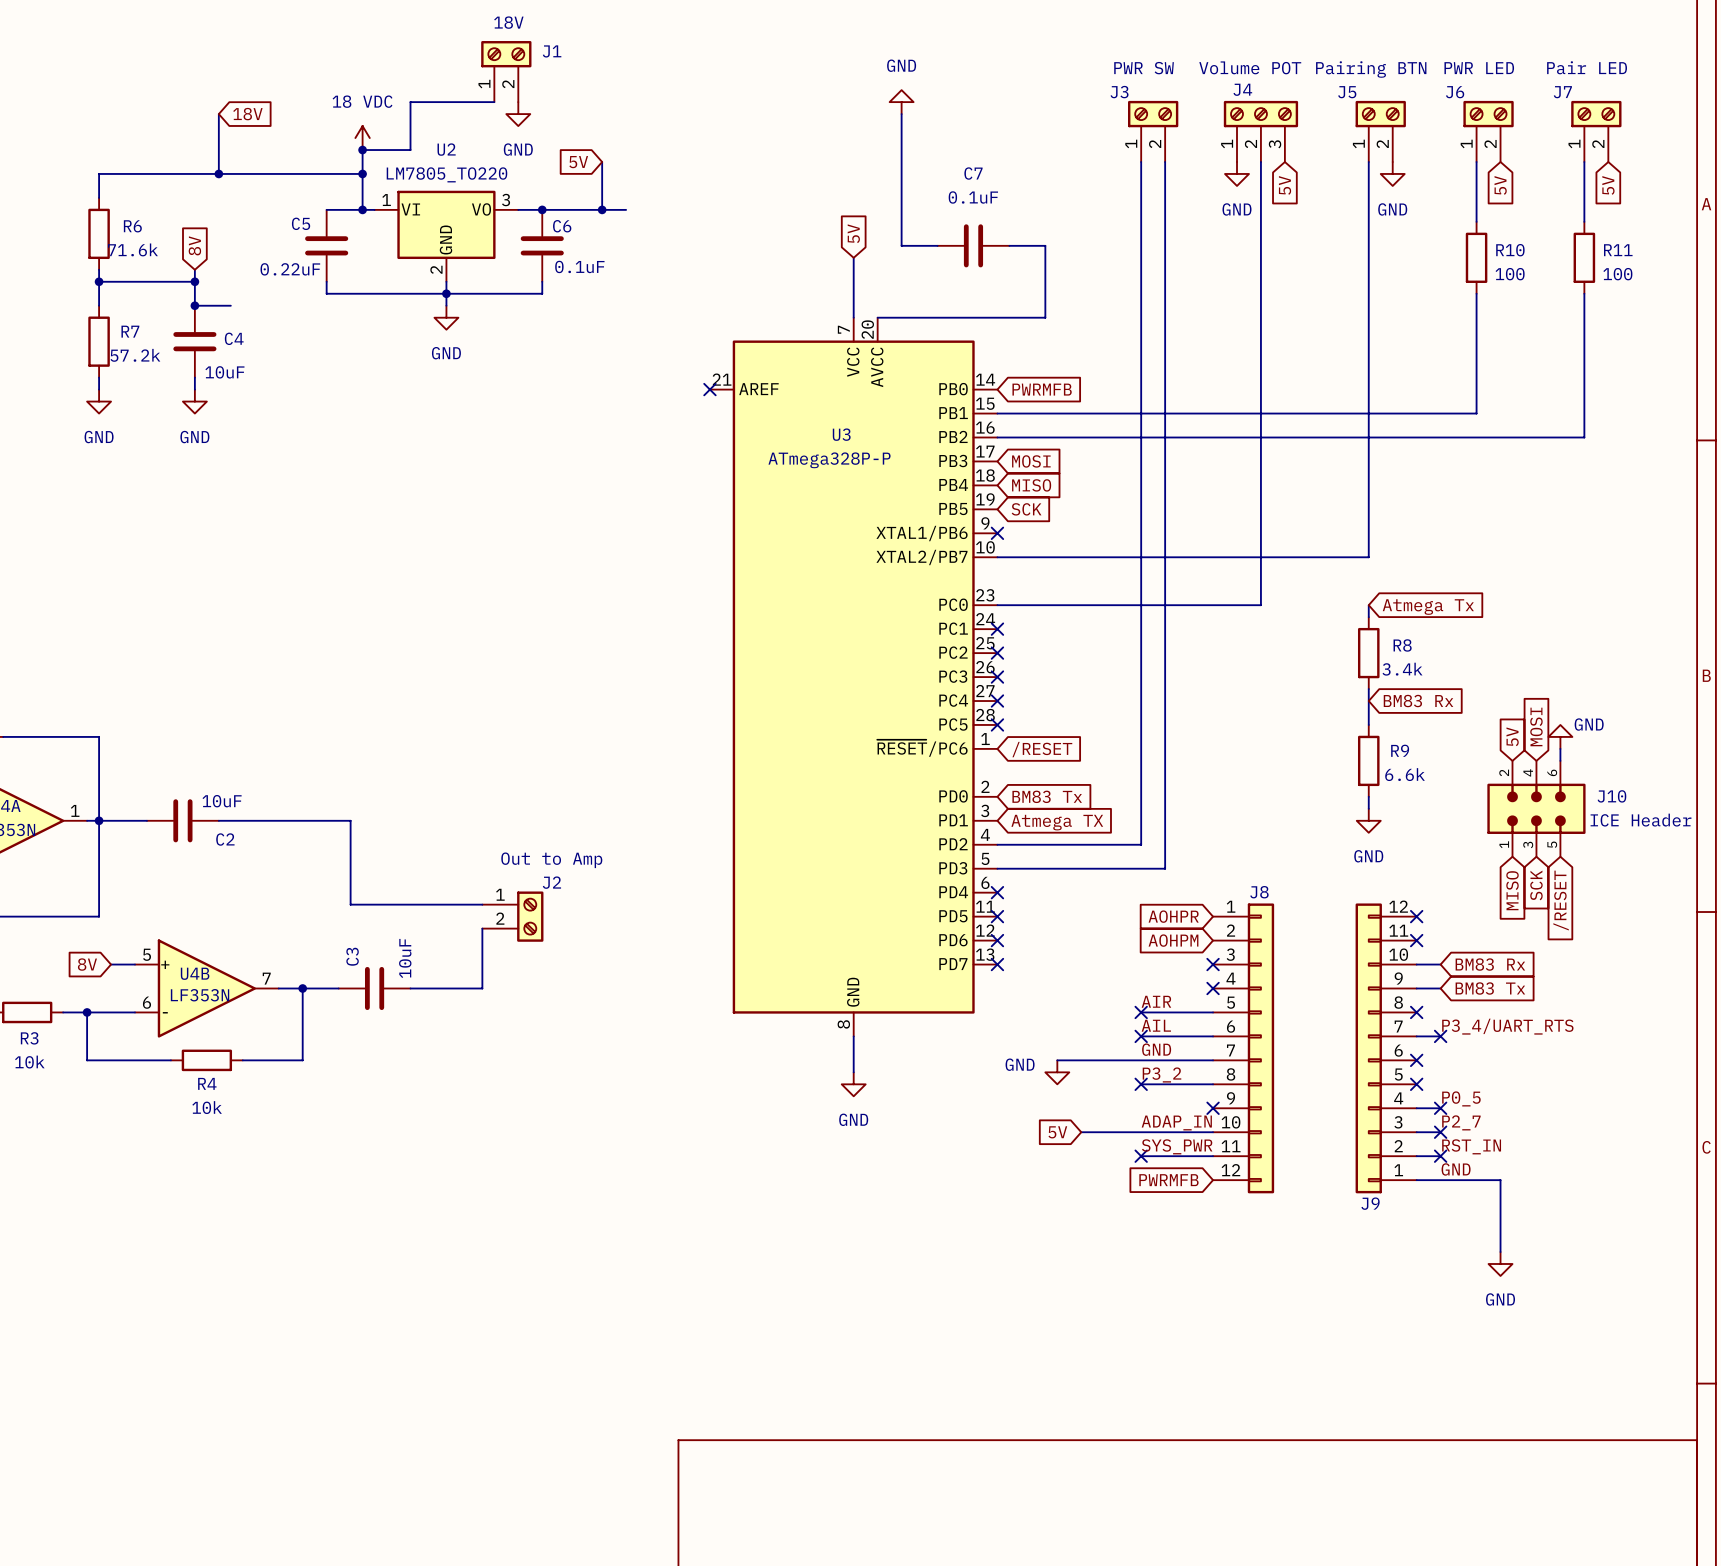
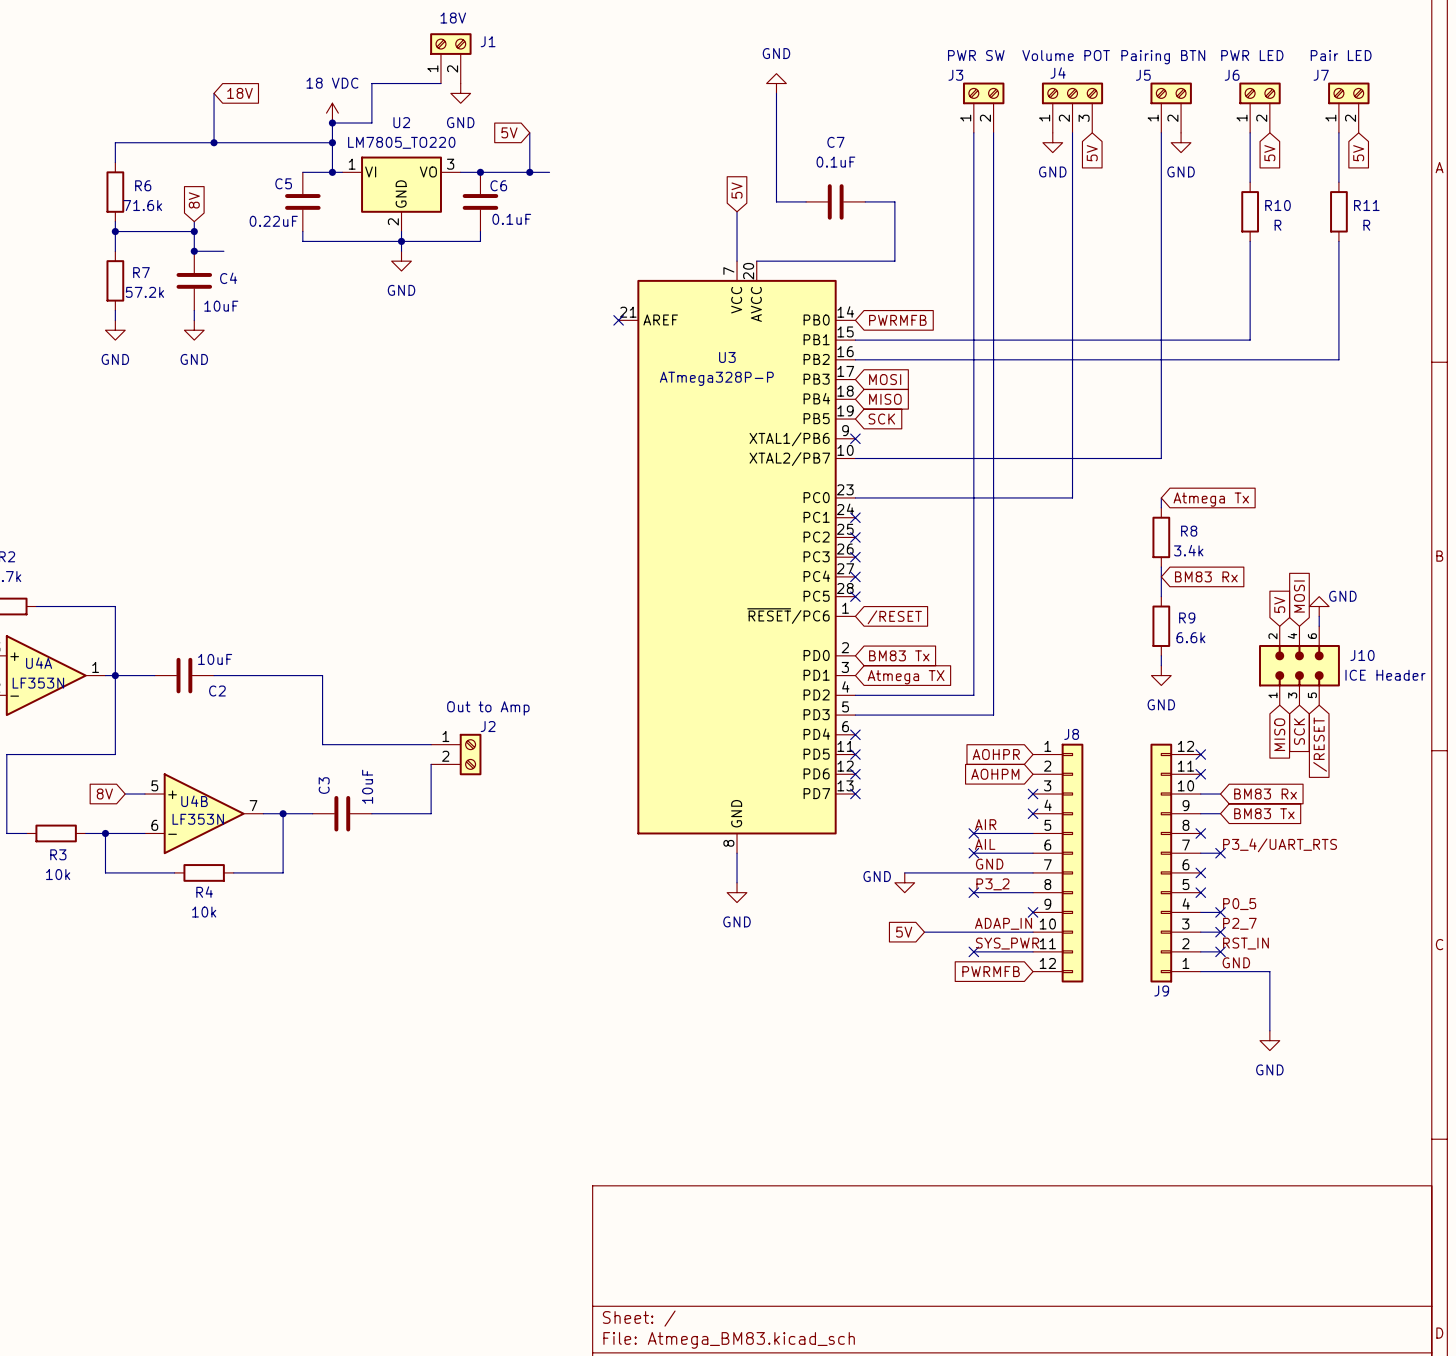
R10 value: 100 (1510, 274) -> R (1277, 225)
R11 value: 100 (1617, 274) -> R (1366, 225)

